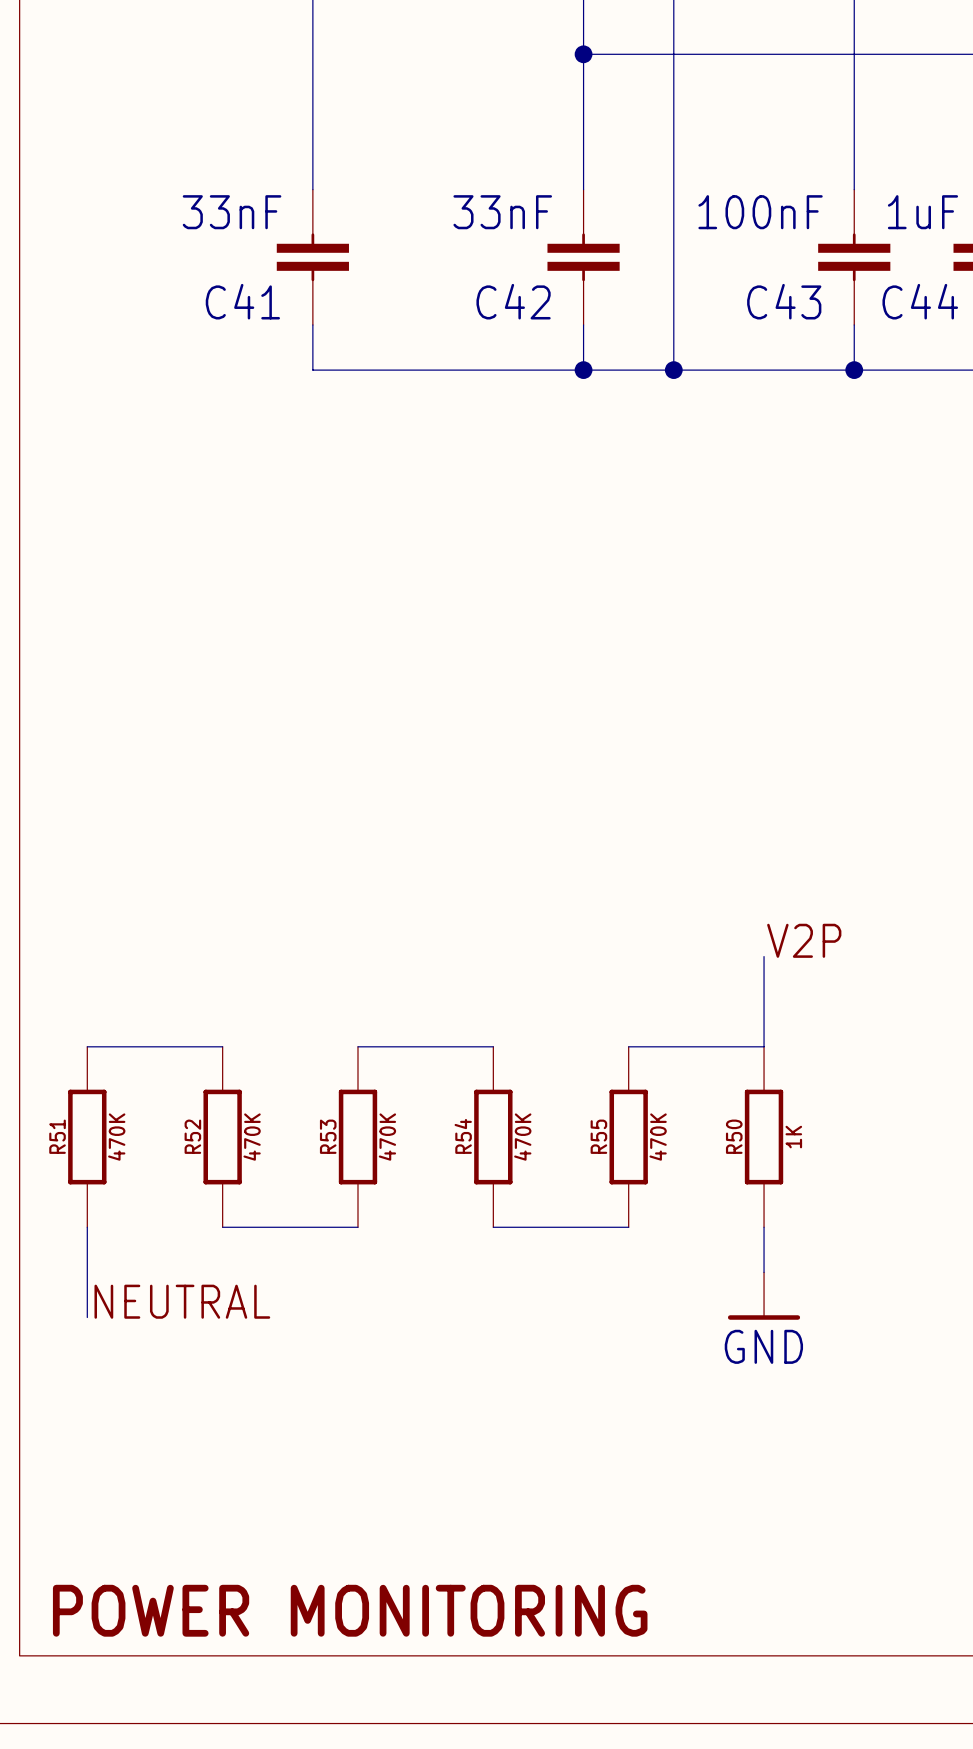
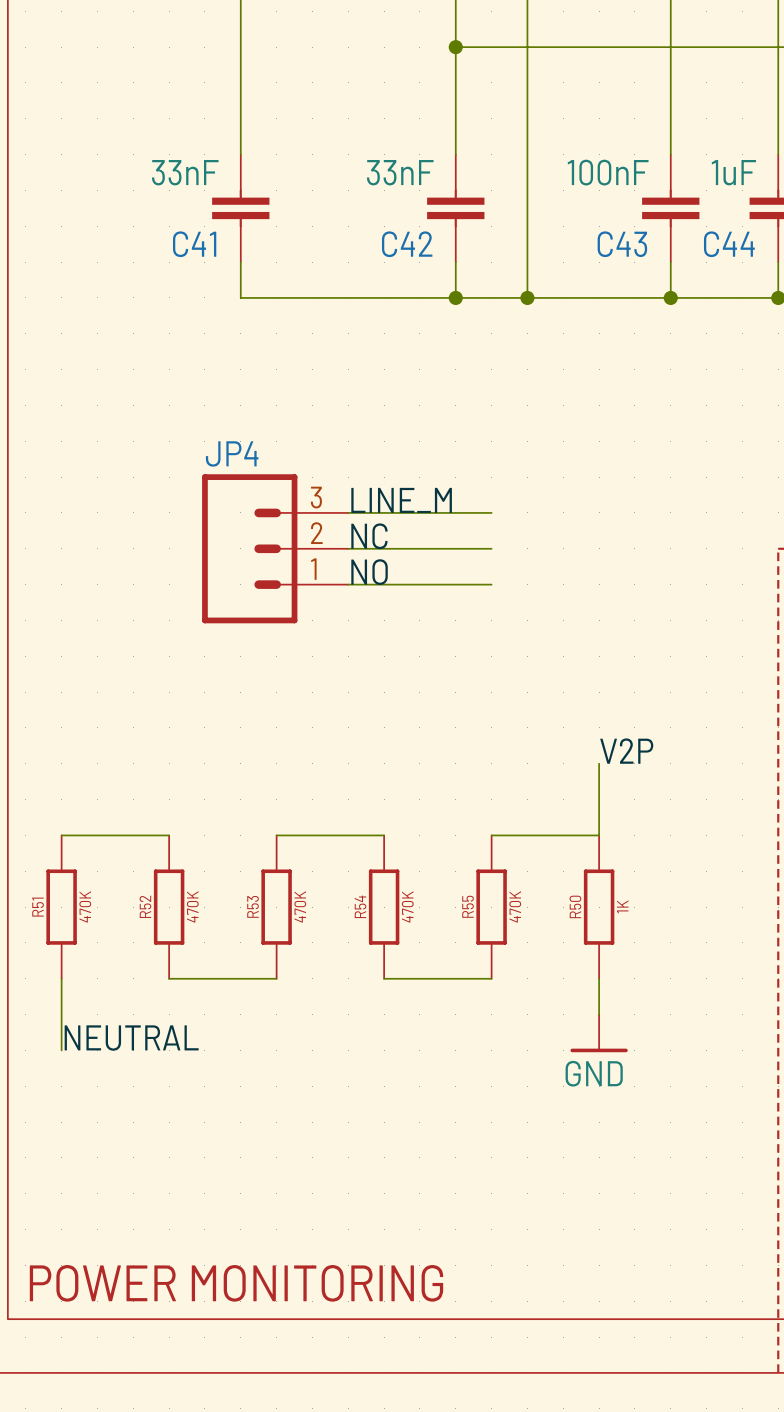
label: none -> LINE_M (401, 500)
wire: none -> (348, 512) (491, 512)
label: none -> NC (369, 536)
JP4: none -> (275, 548)
wire: none -> (348, 548) (491, 548)
label: none -> NO (369, 572)
wire: none -> (348, 584) (491, 584)

